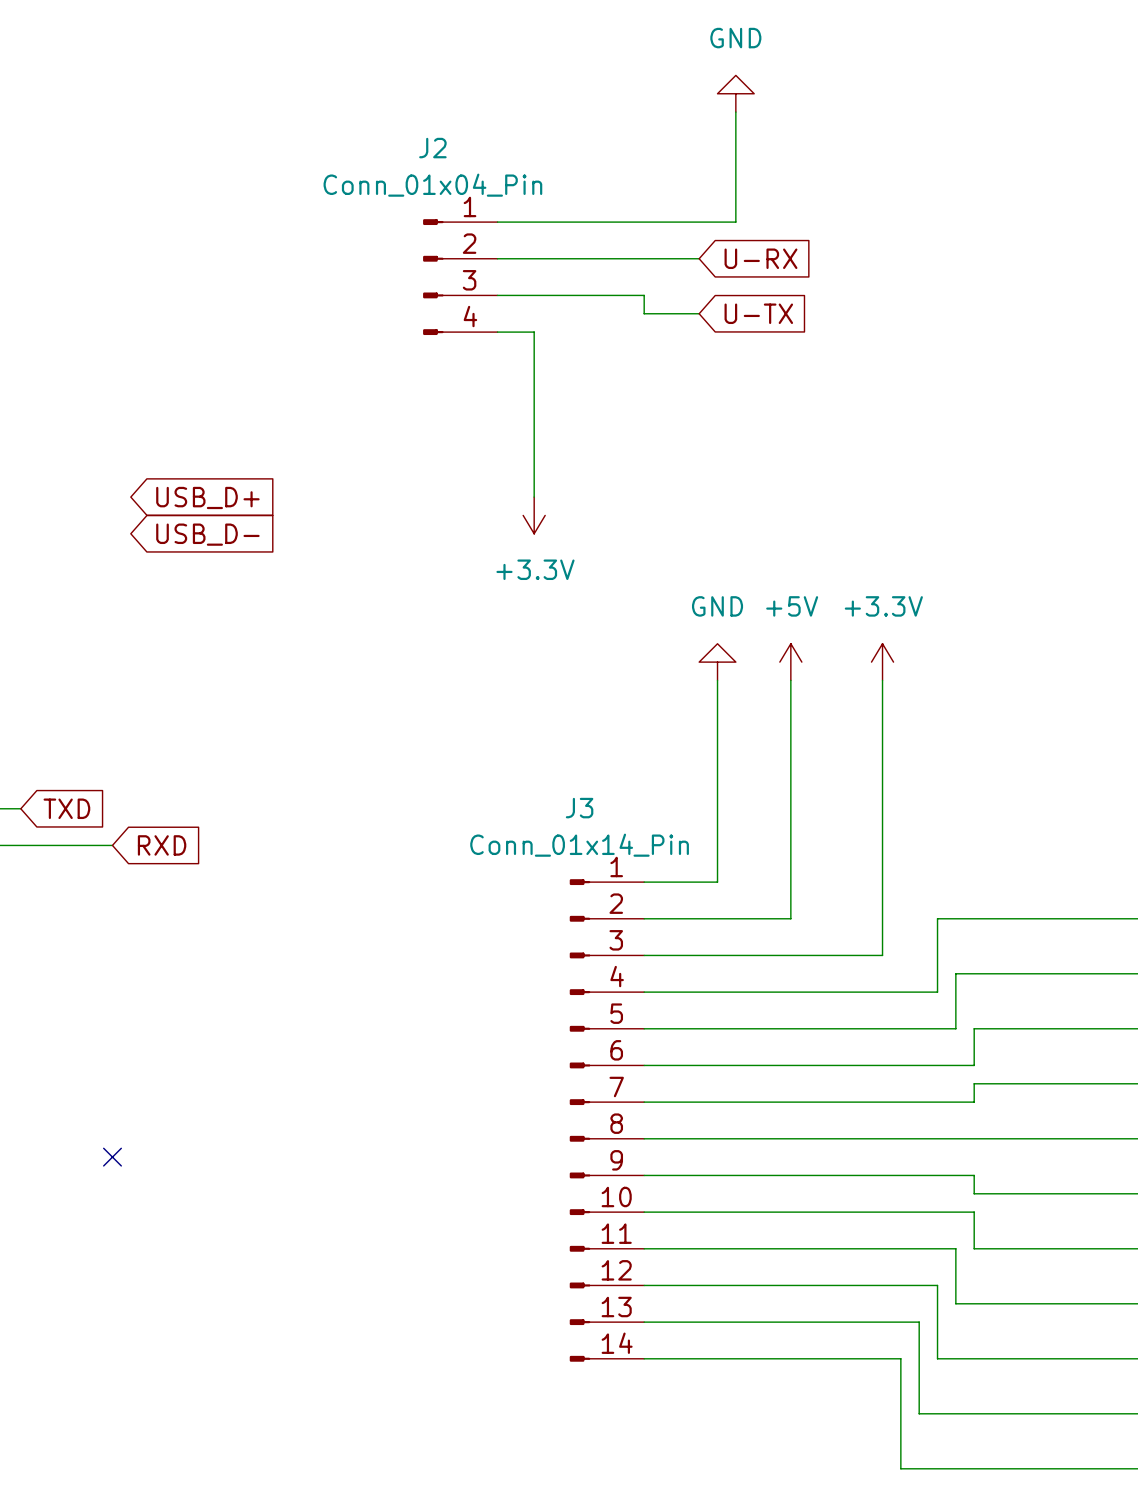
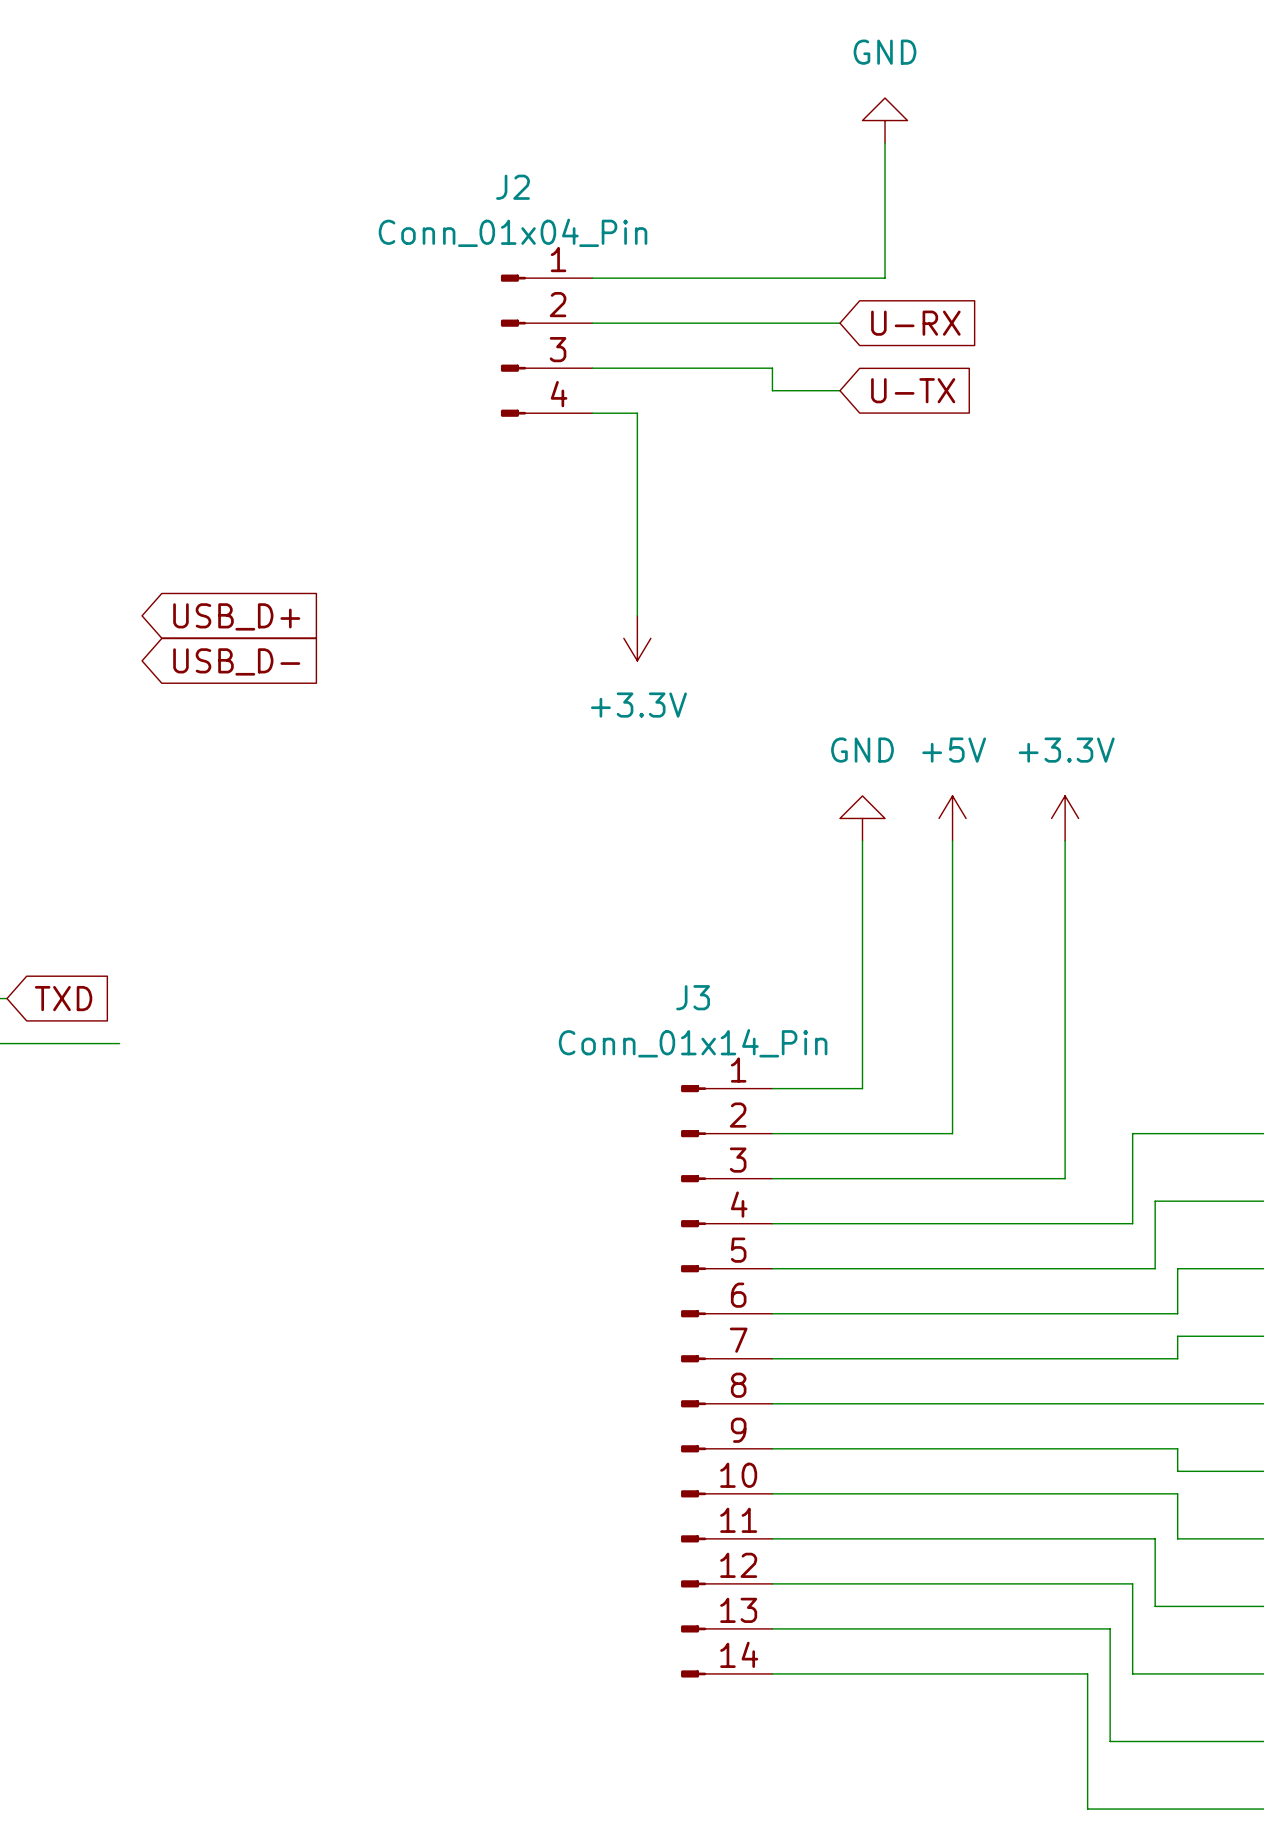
global label: RXD (162, 845) -> none
no-connect mark: (112, 1157) -> none

